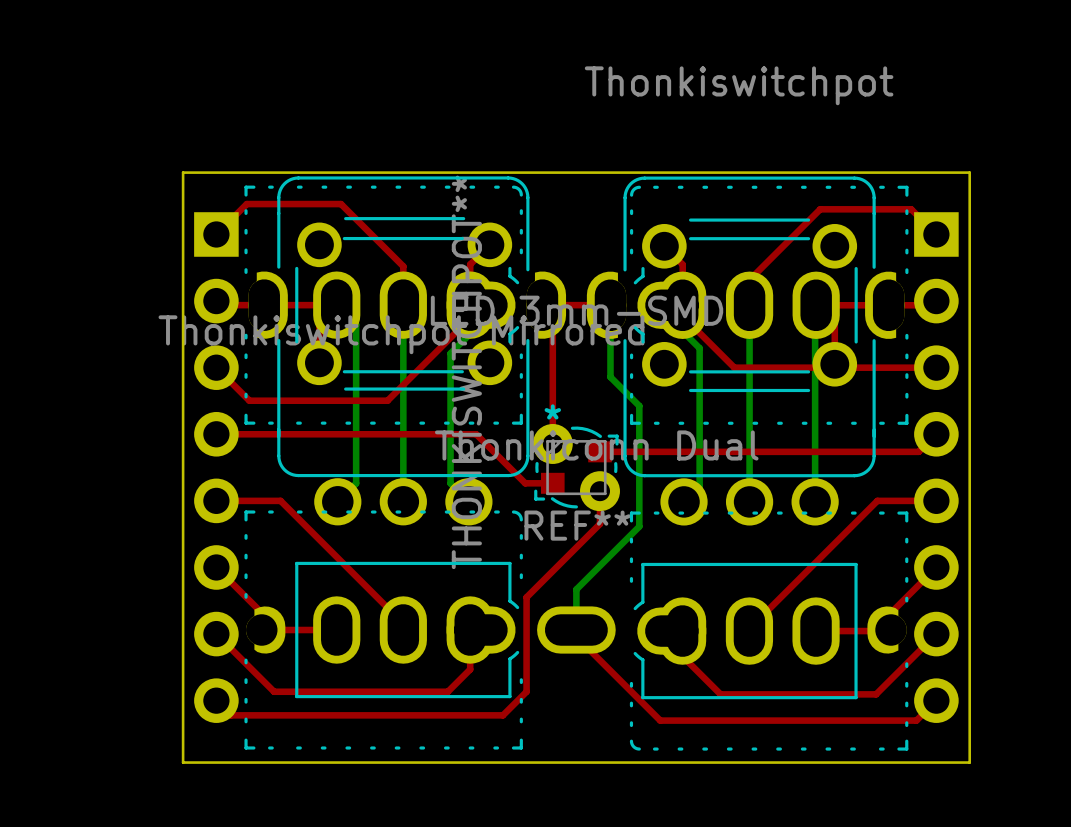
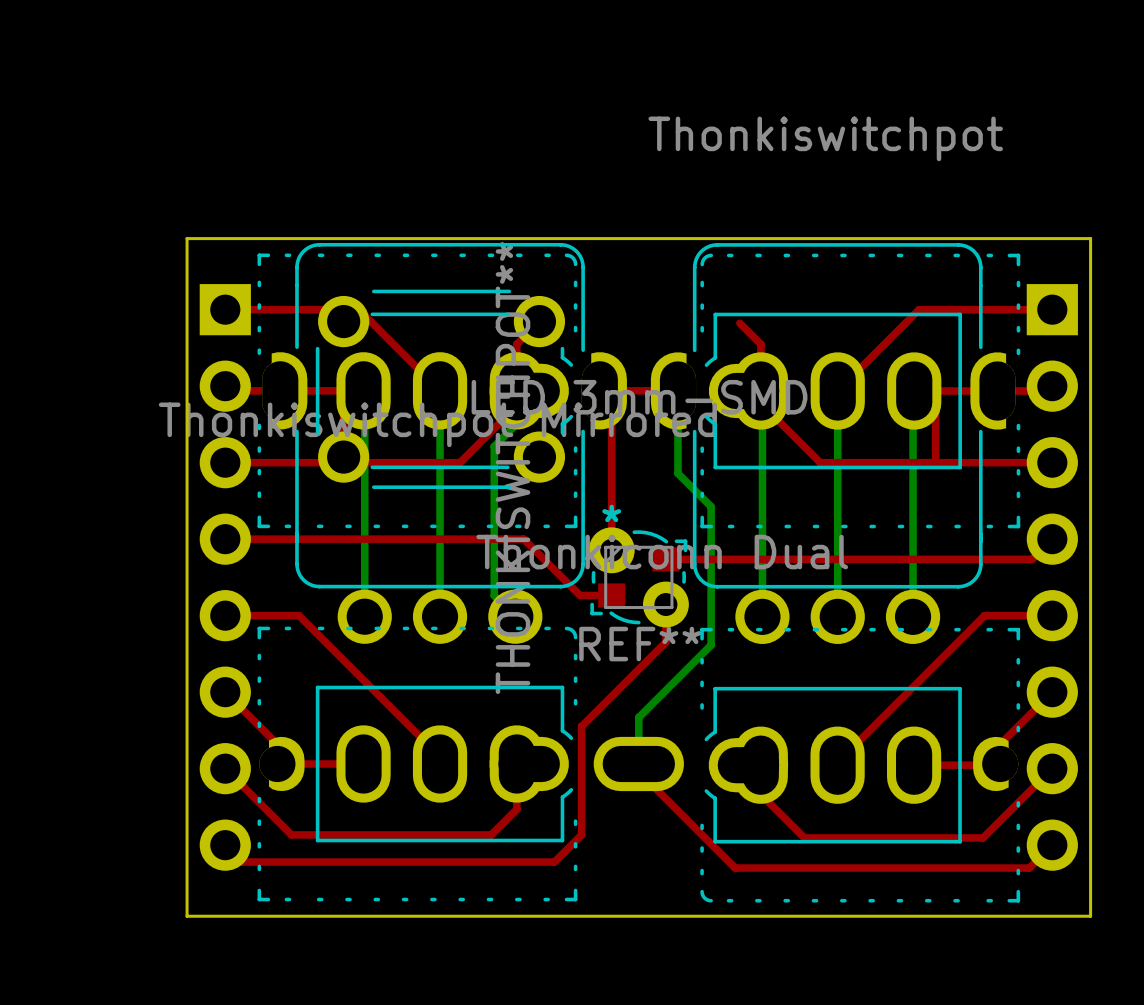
part footprint: [586, 176, 909, 526] -> [650, 243, 1021, 644]
top track: (216, 234) (246, 204) (341, 204) (403, 266) (403, 305) -> (225, 309) (358, 309) (440, 390)
top track: (936, 234) (911, 209) (820, 209) (749, 279) (749, 305) -> (1052, 309) (919, 309) (837, 390)
bottom track: (682, 305) (682, 331) (699, 348) (699, 486) (684, 501) -> (760, 390) (762, 616)
bottom track: (337, 306) (356, 324) (356, 483) (337, 501) -> (364, 392) (364, 616)
top track: (216, 367) (249, 400) (387, 400) (420, 367) -> (225, 462) (459, 462)

